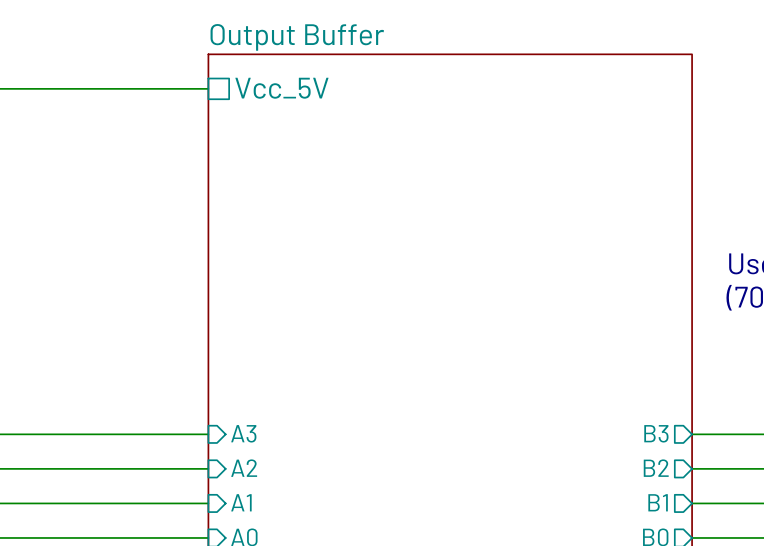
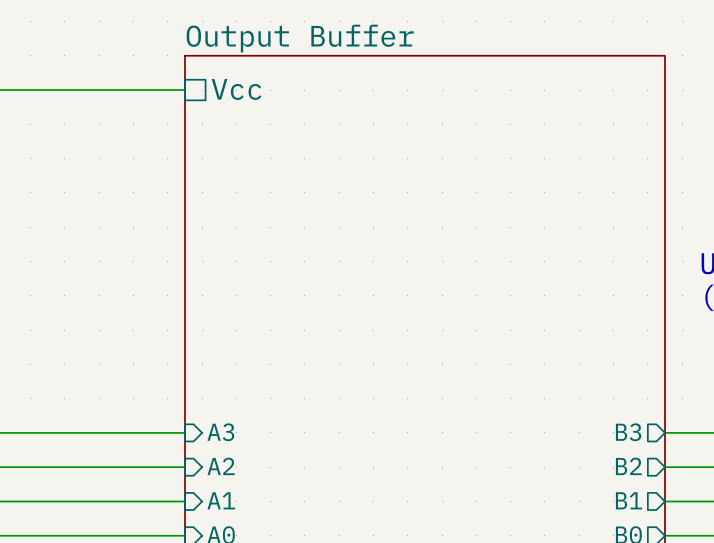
sheet pin: Vcc_5V (281, 88) -> Vcc (236, 89)

